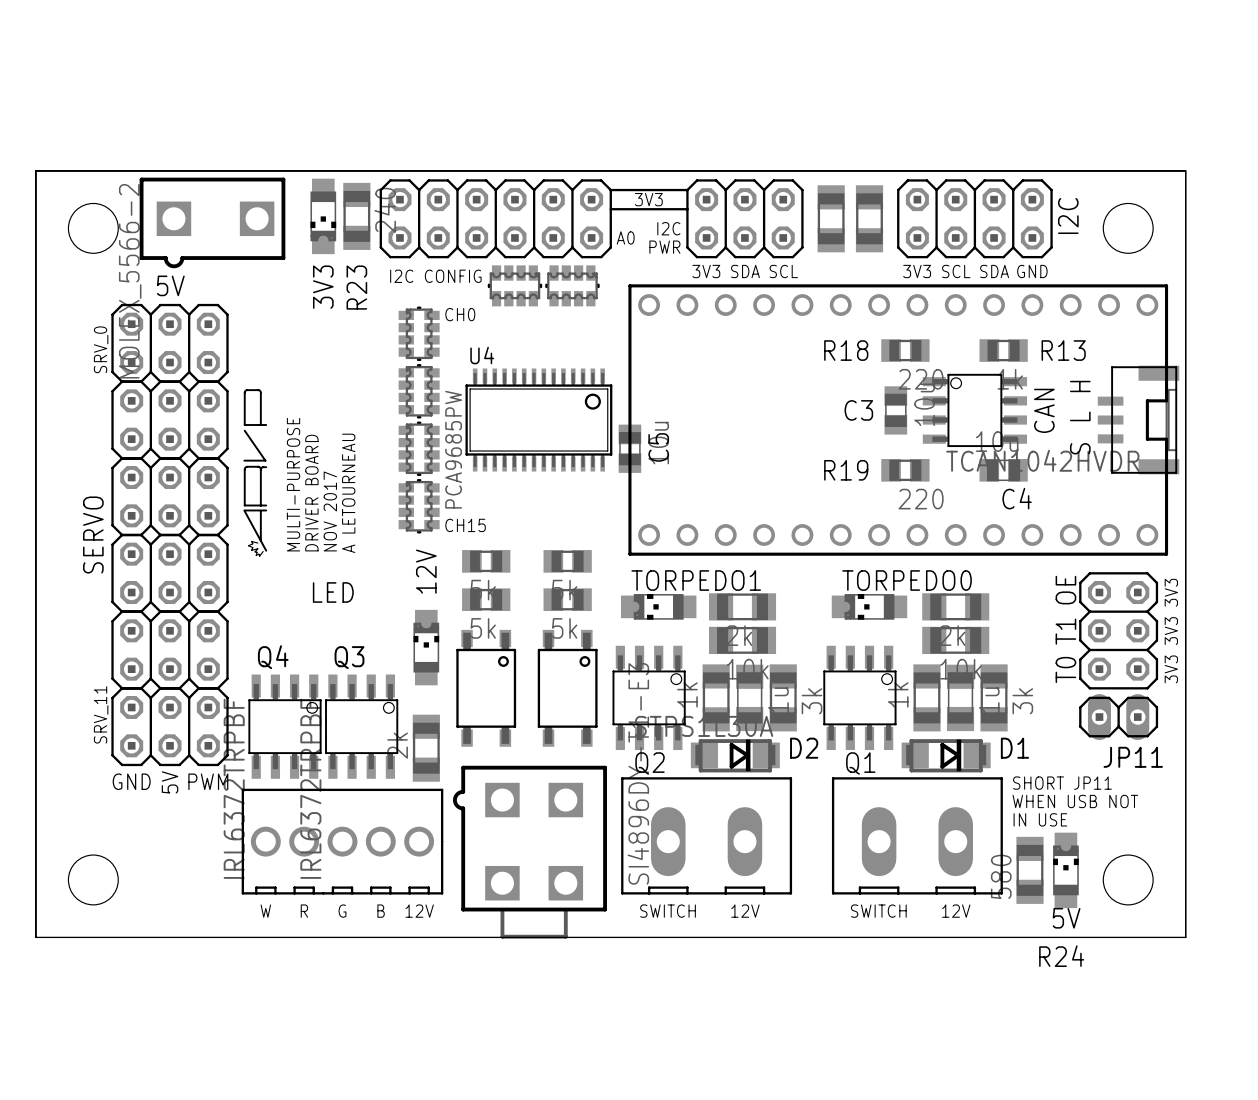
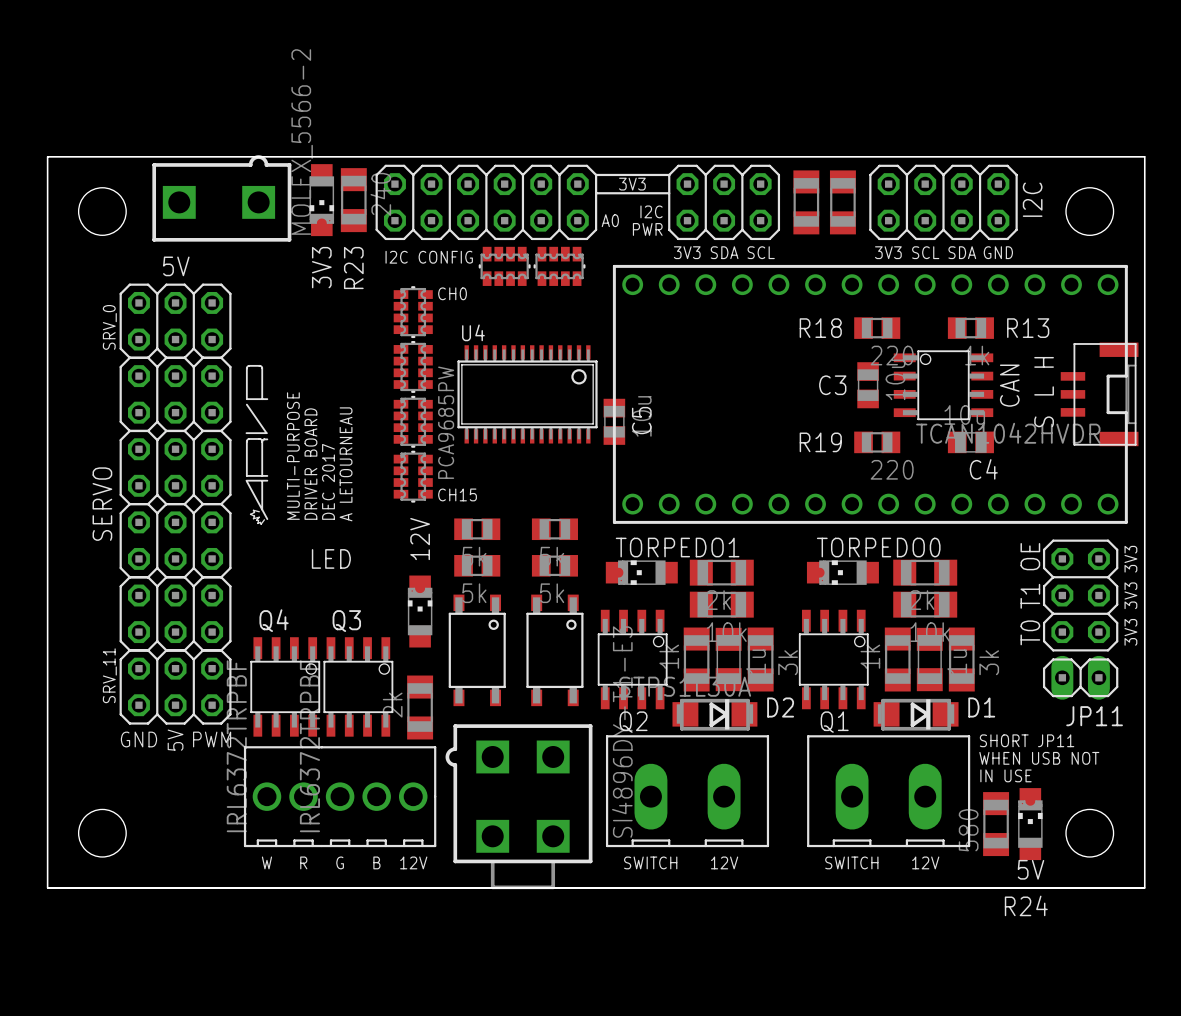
part rotation: 0° (212, 222) -> 180° (221, 198)
text: NOV 2017 (330, 511) -> DEC 2017 (328, 481)

